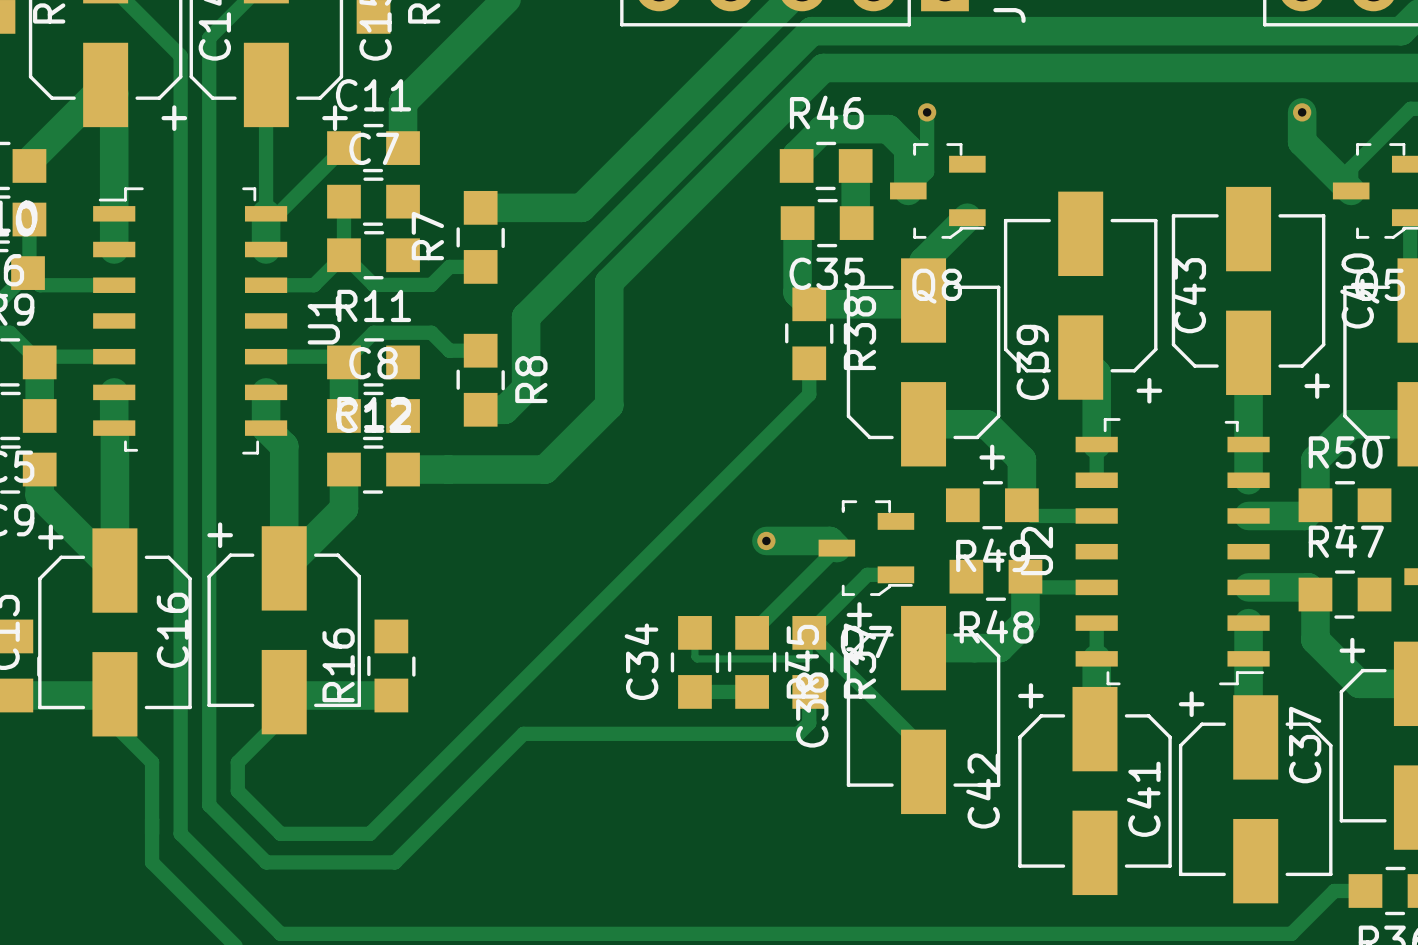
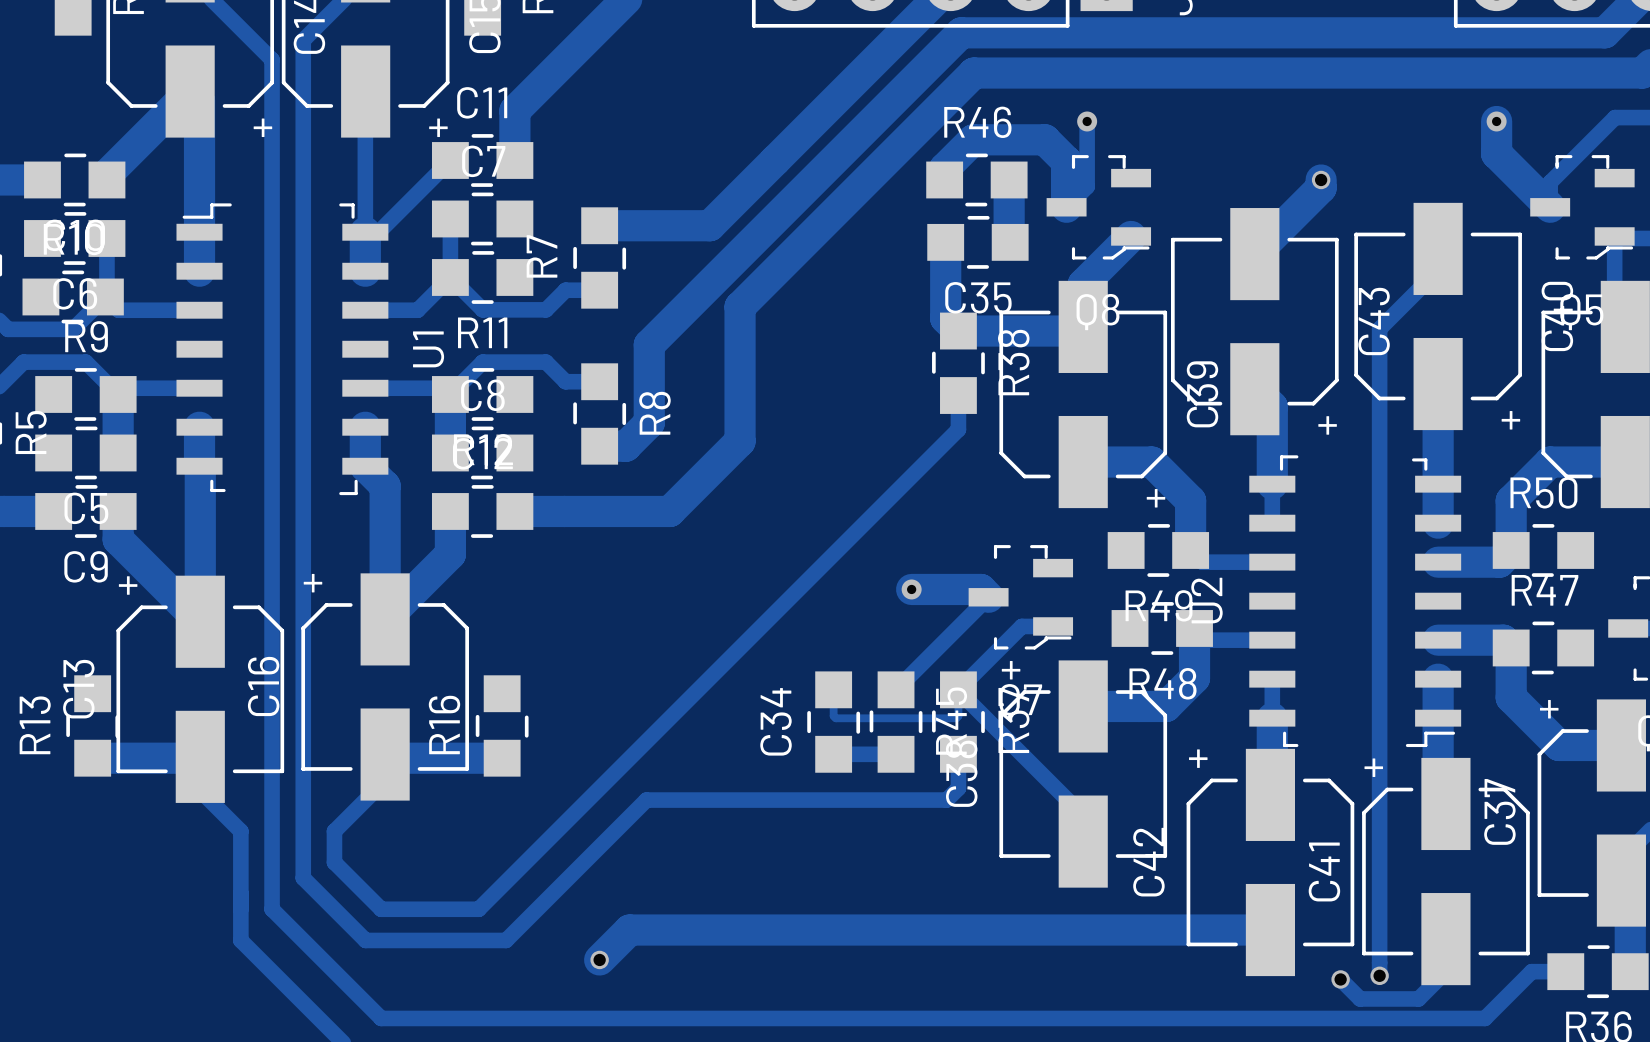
track: none -> (1321, 179) (1321, 187) (1254, 254)
via: none -> (1321, 179)
track: none -> (1438, 248) (1438, 270) (1379, 328) (1379, 975)
track: none -> (1270, 930) (629, 930) (599, 959)
track: none -> (1438, 946) (1445, 939) (1445, 971) (1418, 998) (1360, 998) (1340, 979)
via: none -> (599, 959)
via: none -> (1379, 975)
via: none -> (1340, 979)

